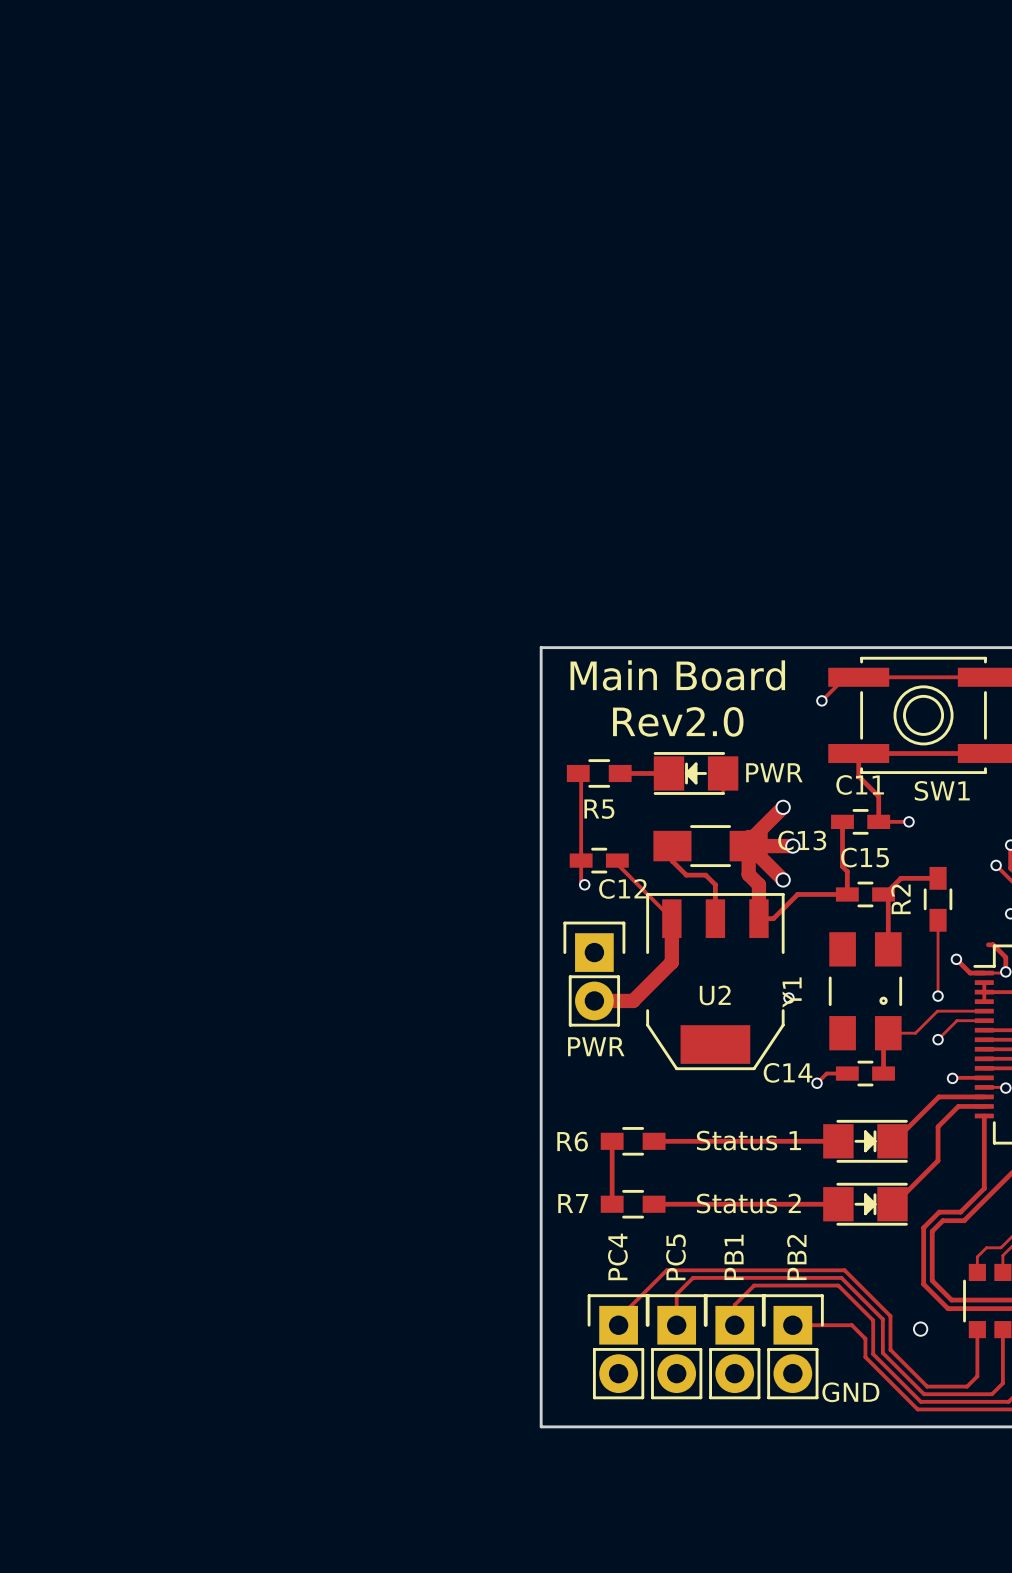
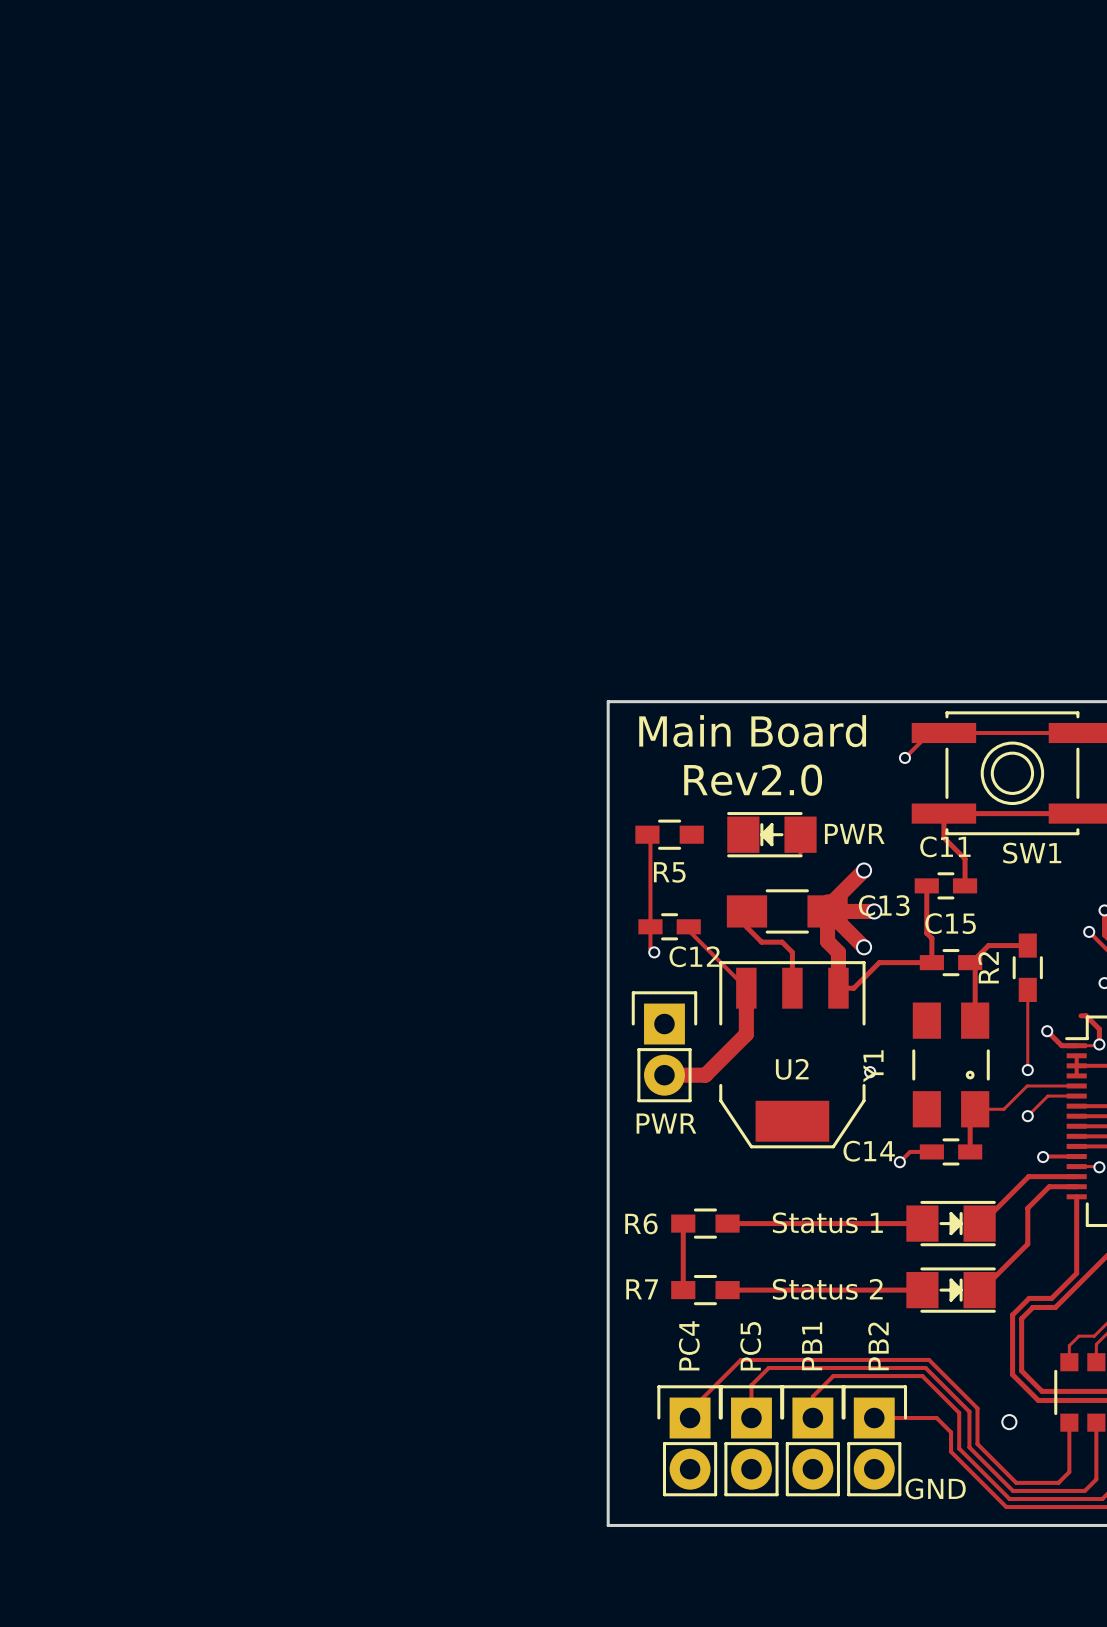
track: (620, 773) (668, 773) -> none
track: (878, 821) (909, 821) -> none
via: (909, 821) -> none

